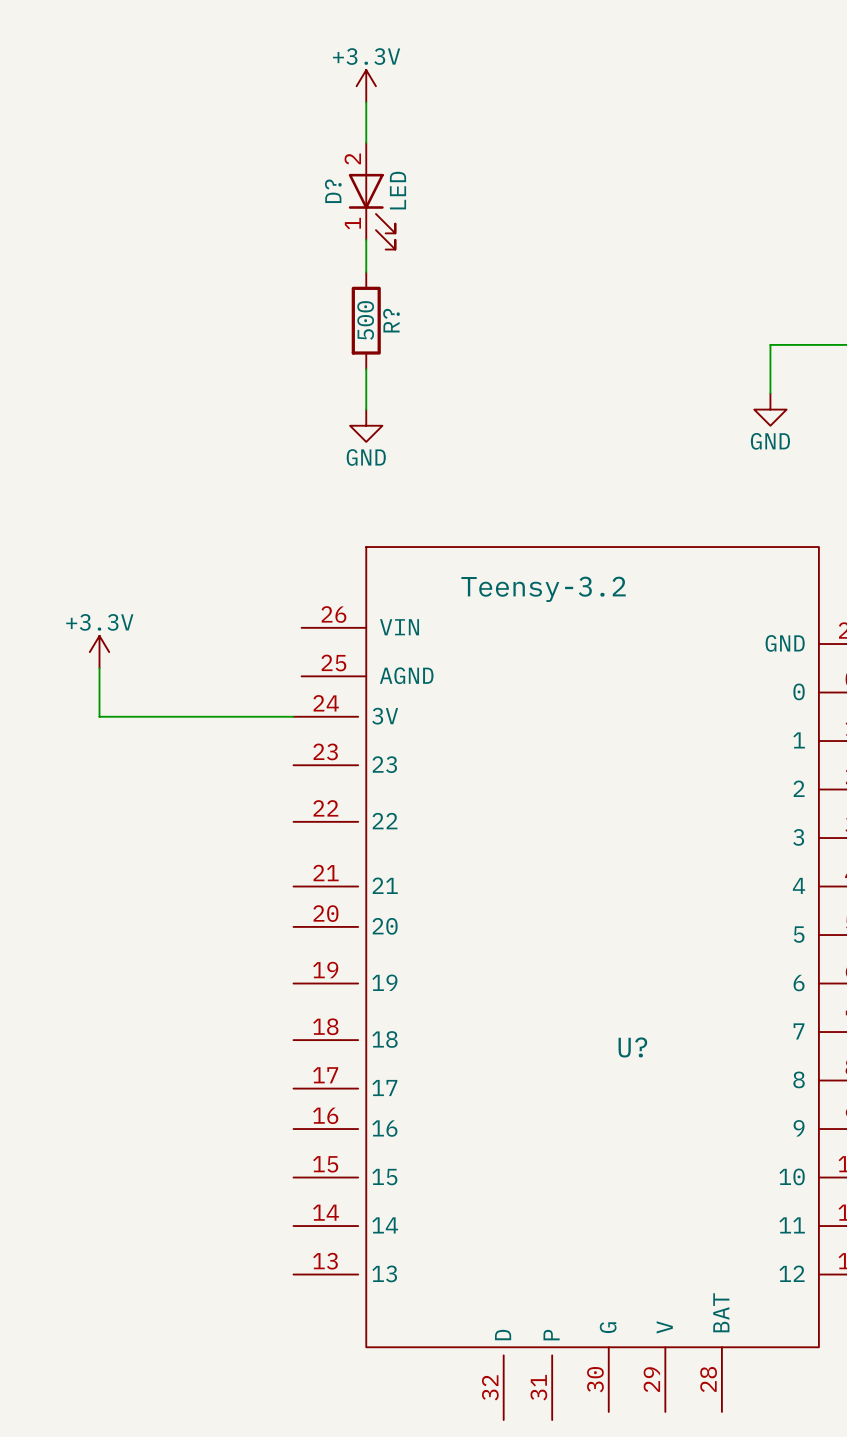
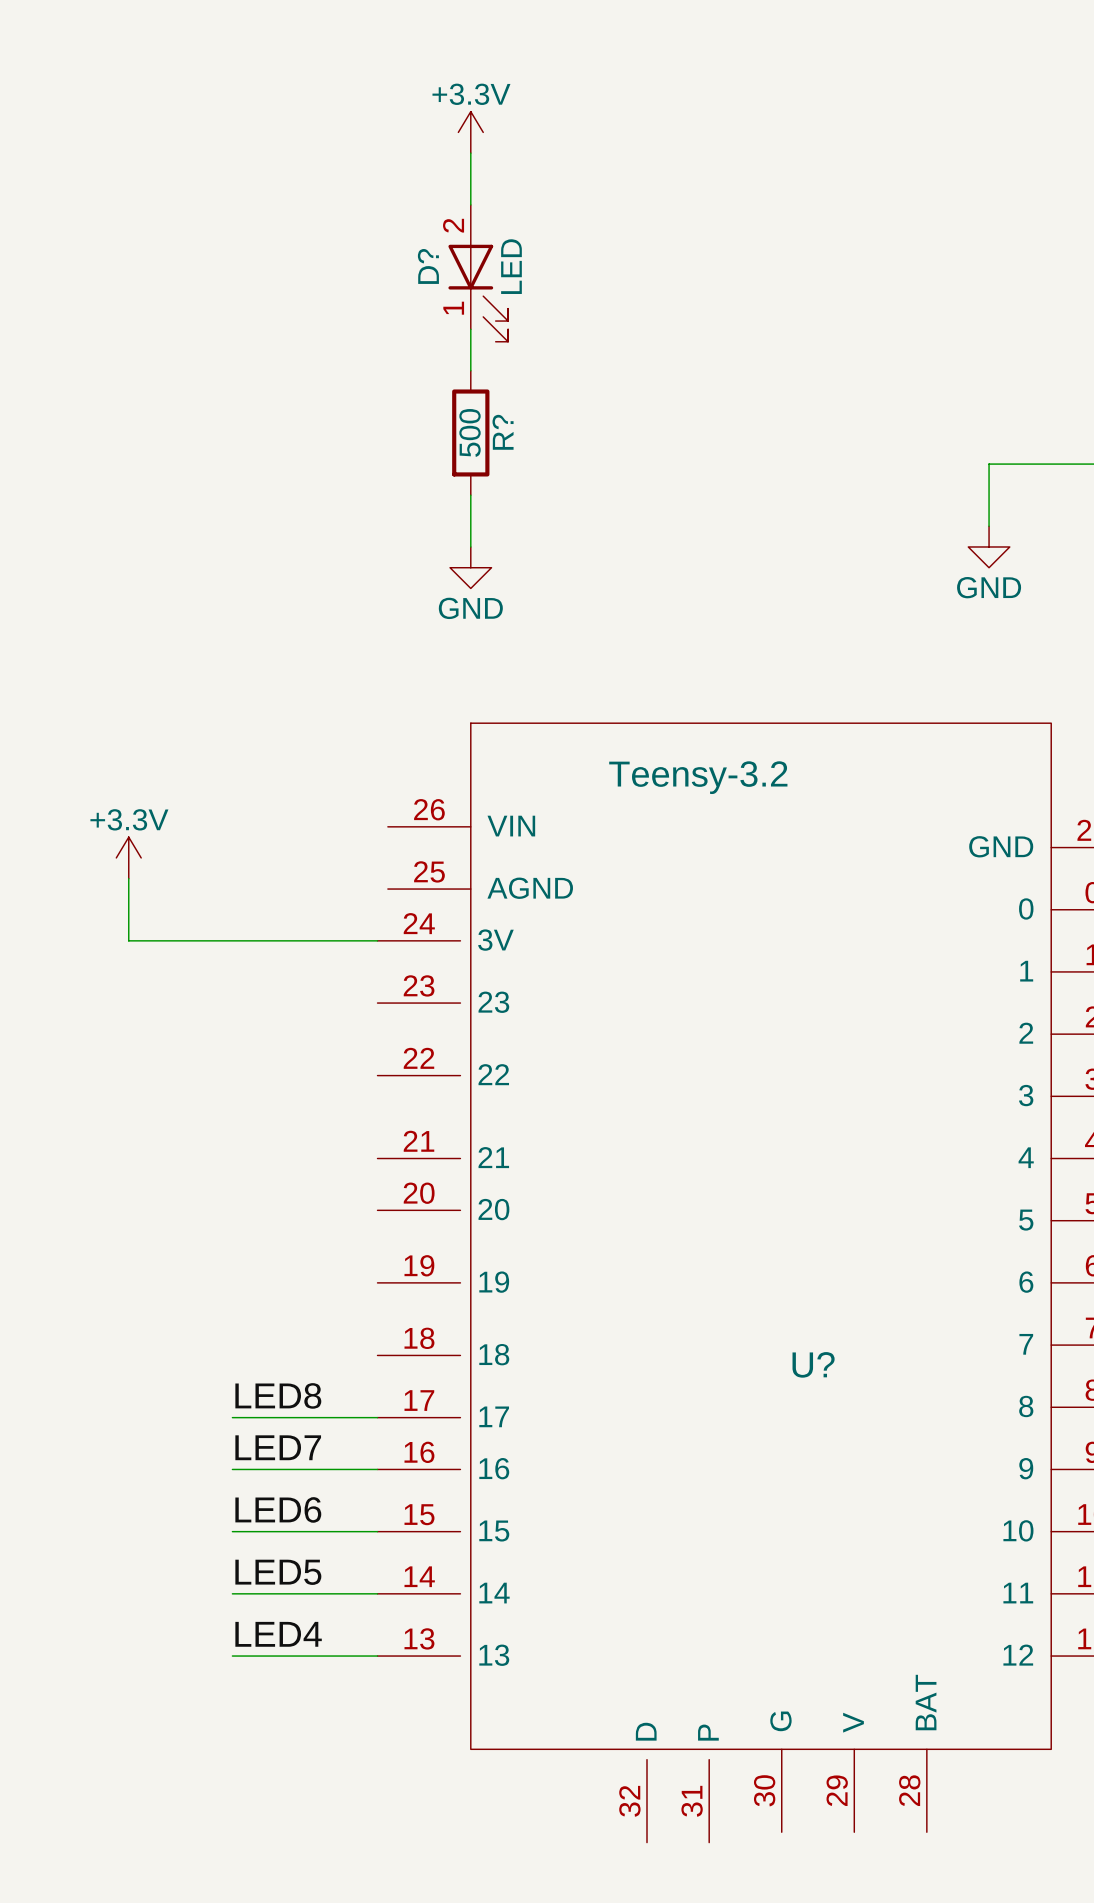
label: none -> LED8 (278, 1395)
wire: none -> (232, 1417) (377, 1417)
label: none -> LED7 (278, 1447)
wire: none -> (232, 1469) (377, 1469)
label: none -> LED6 (278, 1509)
wire: none -> (232, 1531) (377, 1531)
label: none -> LED5 (278, 1572)
wire: none -> (232, 1593) (377, 1593)
label: none -> LED4 (278, 1634)
wire: none -> (232, 1656) (377, 1656)

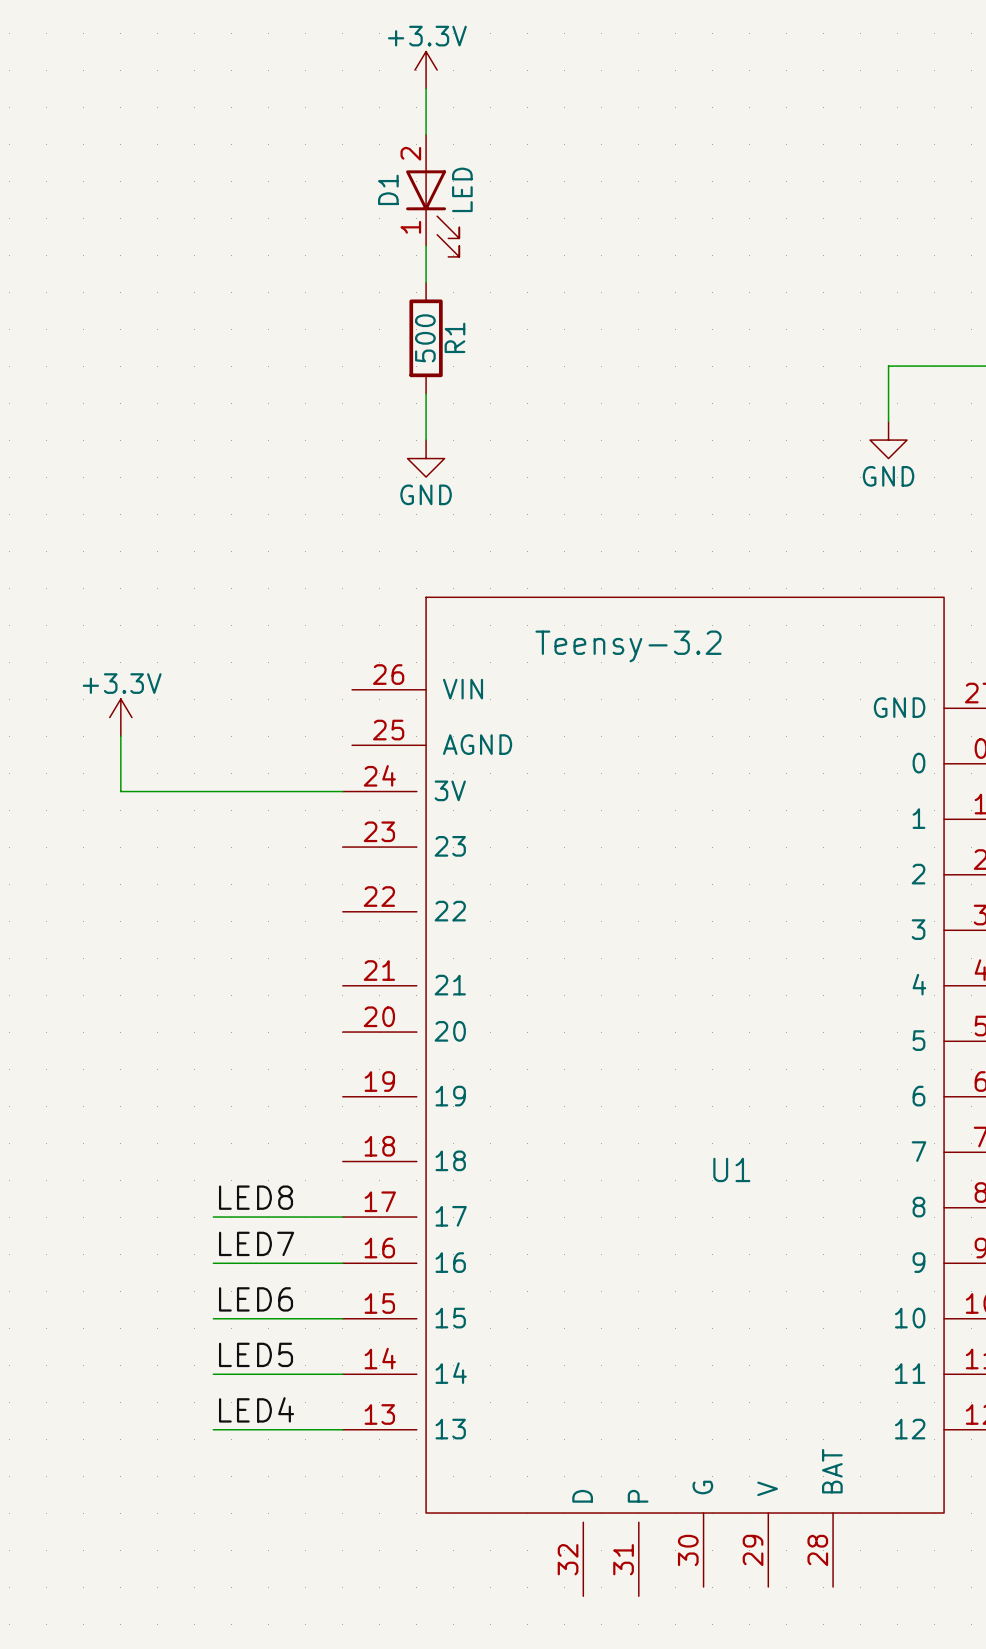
D? name: D? (428, 266) -> D1 (388, 189)
R? name: R? (503, 432) -> R1 (454, 337)
U? name: U? (813, 1364) -> U1 (731, 1169)

